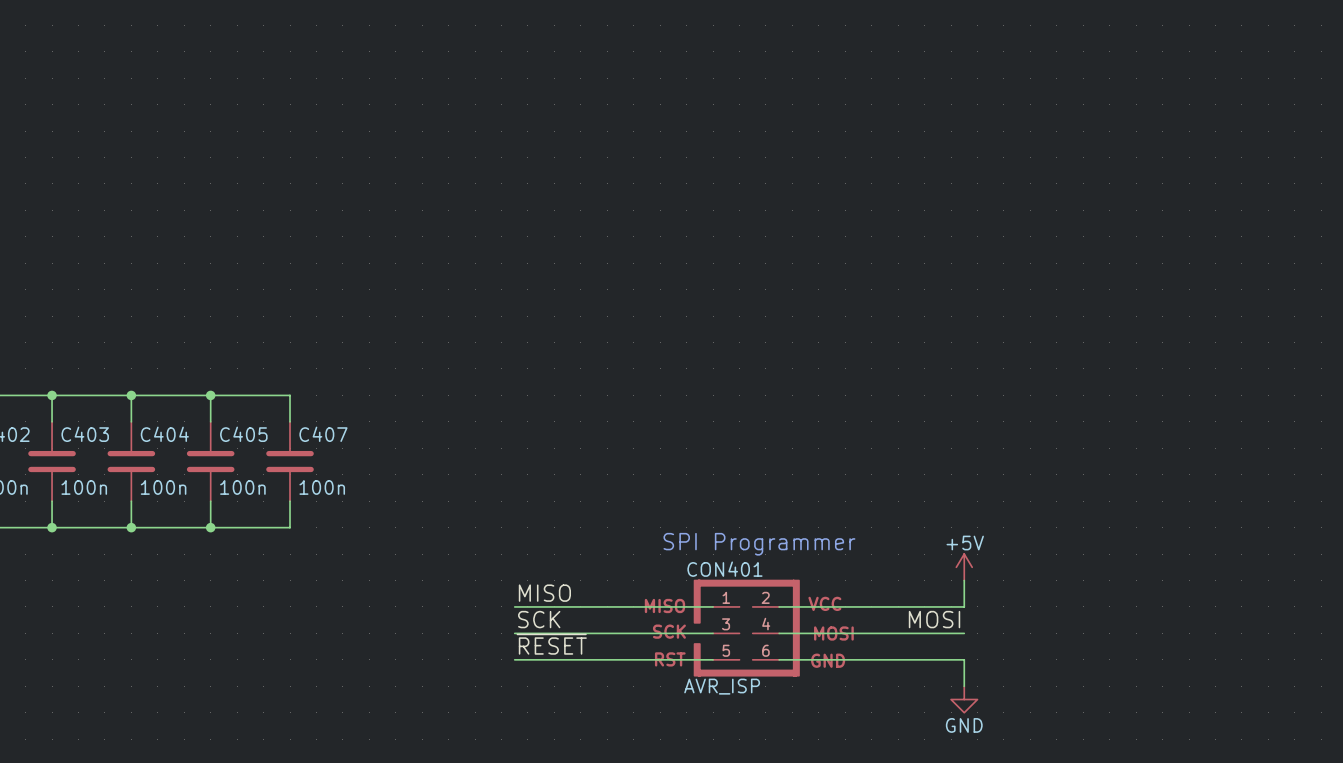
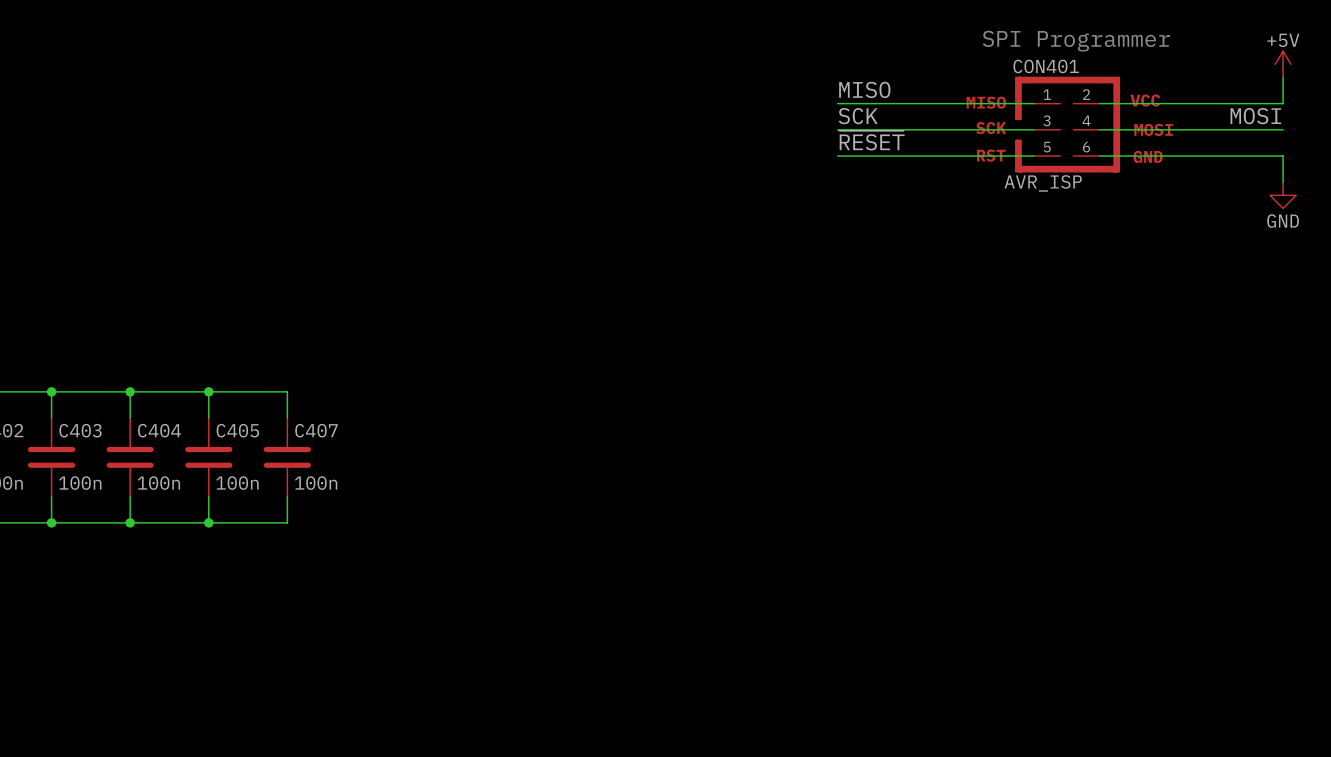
text: none -> SPI Programmer (1076, 41)
power symbol: none -> +5V (1283, 64)
wire: none -> (1283, 77) (1283, 103) (1099, 103)
label: none -> MISO (864, 89)
wire: none -> (837, 103) (1034, 103)
label: none -> SCK (858, 116)
label: none -> MOSI (1255, 116)
wire: none -> (837, 129) (1034, 129)
wire: none -> (1099, 129) (1283, 129)
label: none -> ~{RESET} (871, 140)
wire: none -> (837, 156) (1034, 156)
wire: none -> (1099, 156) (1283, 156) (1283, 182)
power symbol: none -> GND (1283, 195)
text: SPI Programmer (759, 544) -> none
power symbol: +5V (964, 567) -> none
wire: (964, 580) (964, 606) (779, 606) -> none
label: MISO (544, 593) -> none
wire: (514, 606) (713, 606) -> none
label: SCK (539, 619) -> none
label: MOSI (934, 619) -> none
CON401 position: (746, 628) -> (1067, 124)
wire: (514, 633) (713, 633) -> none
wire: (779, 633) (964, 633) -> none
label: ~{RESET} (551, 644) -> none
wire: (514, 659) (713, 659) -> none
wire: (779, 659) (964, 659) (964, 686) -> none
power symbol: GND (964, 699) -> none

